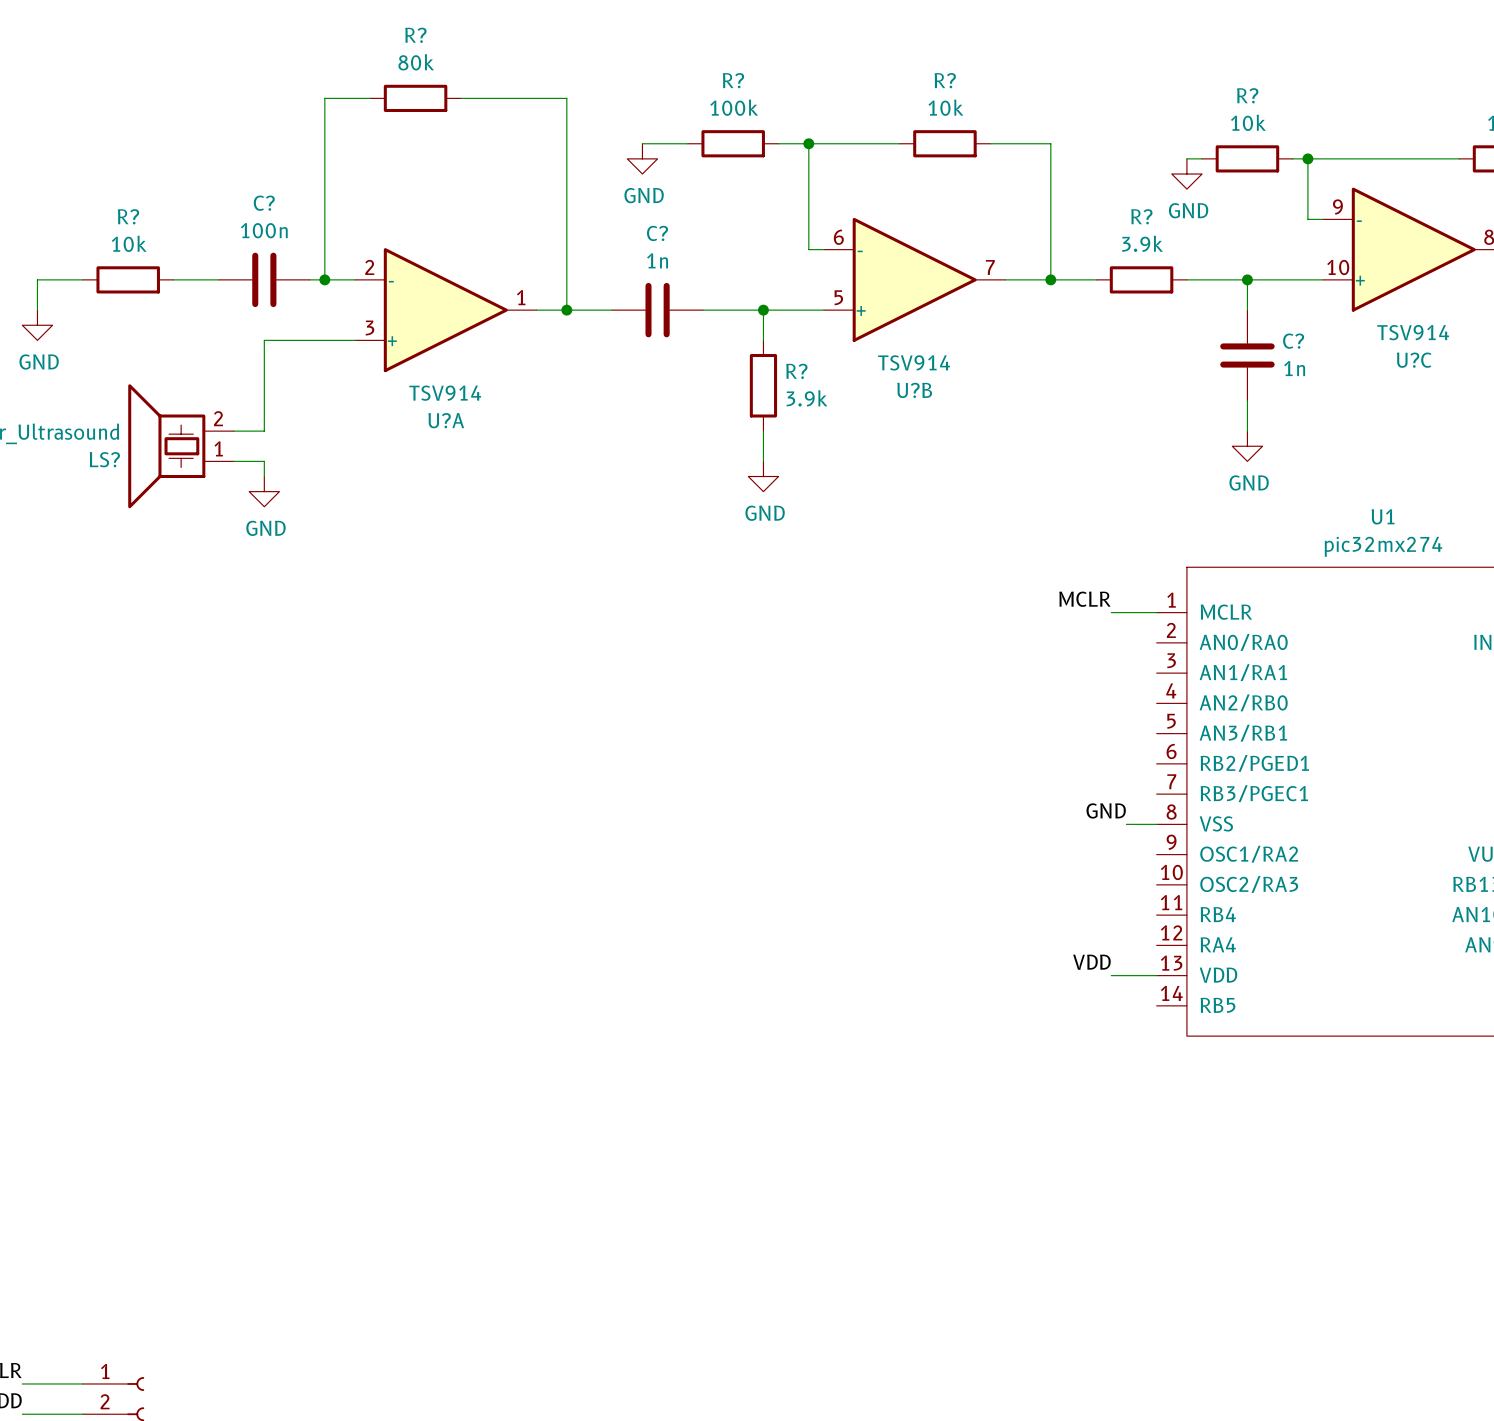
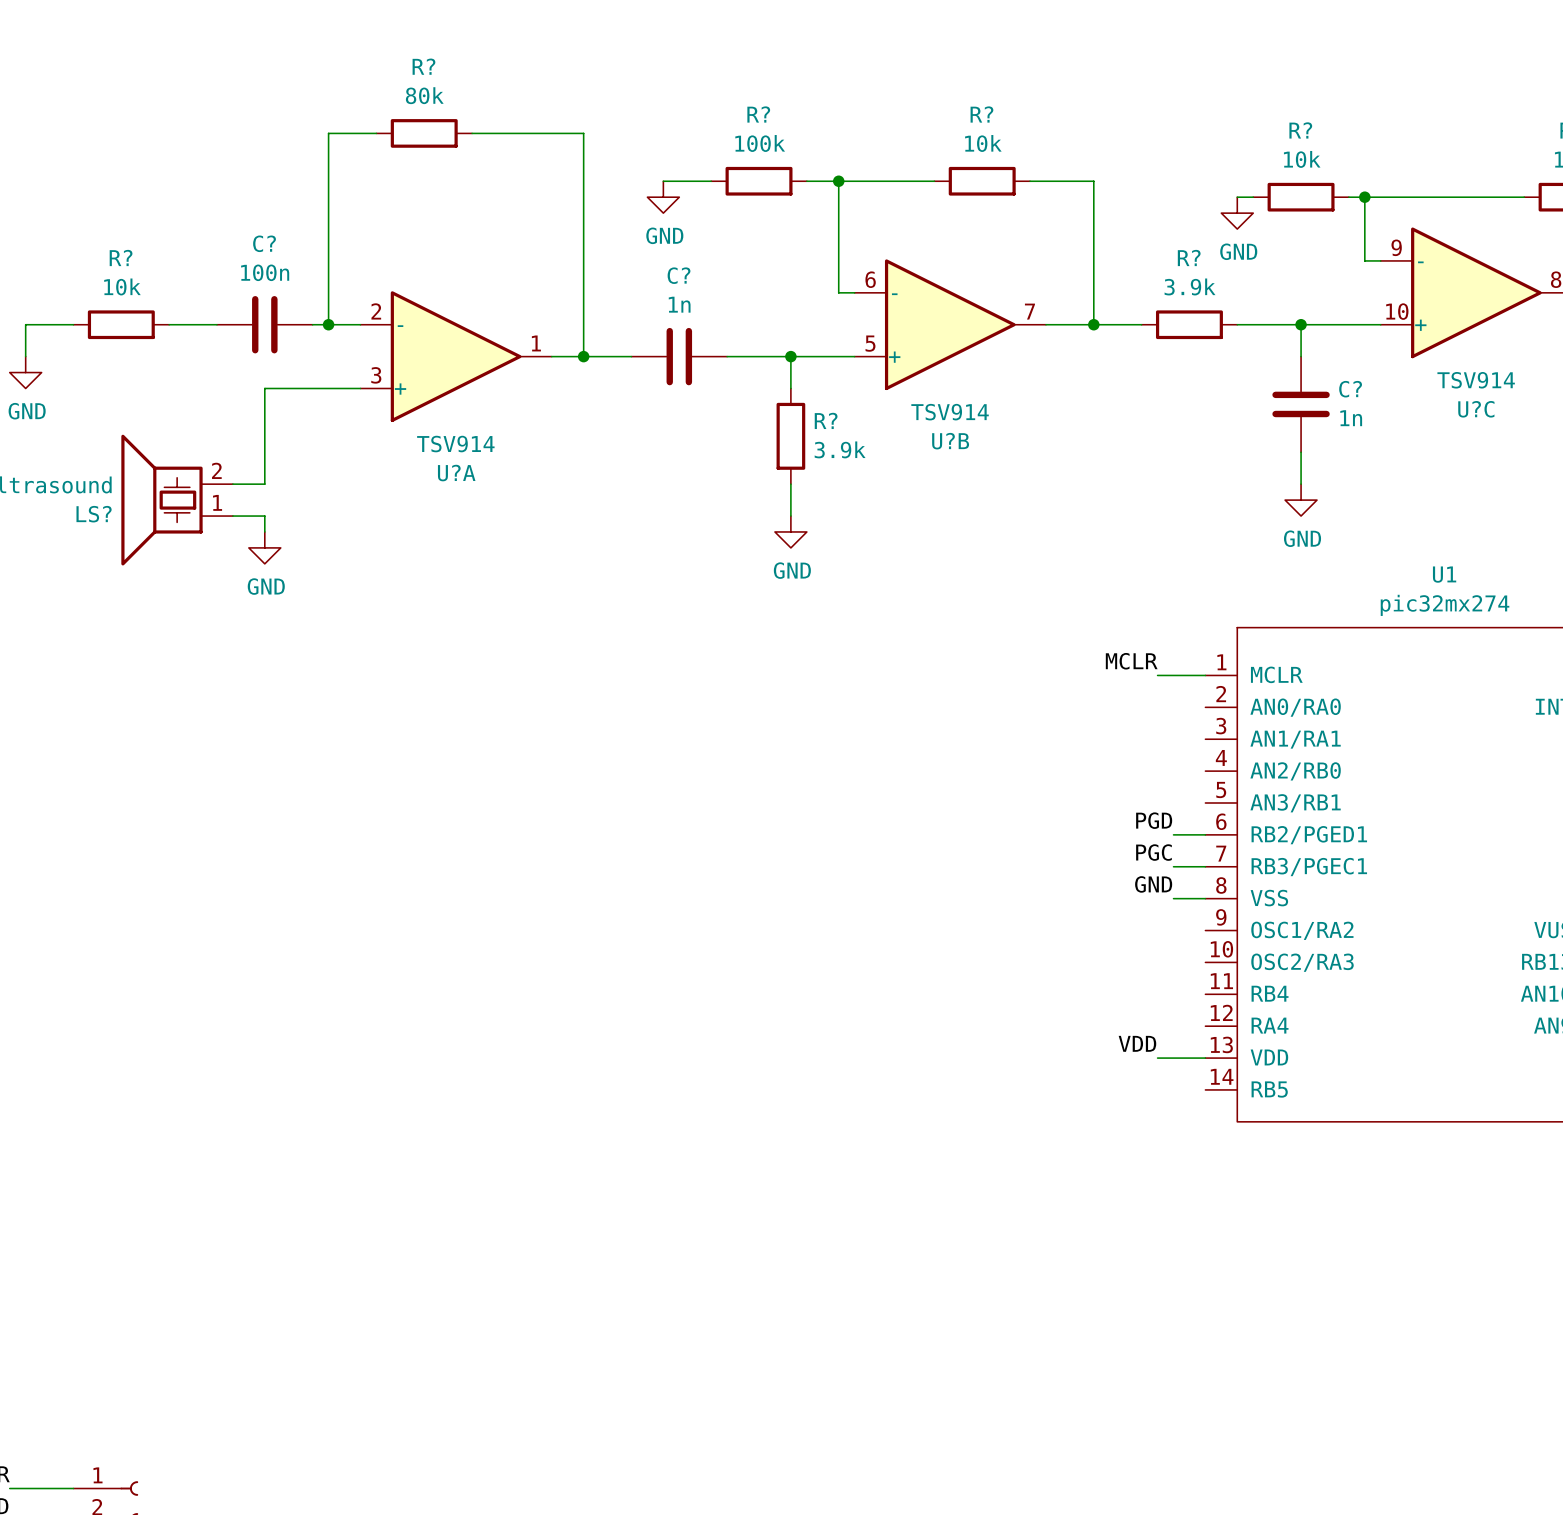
label: none -> PGD (1154, 820)
wire: none -> (1173, 834) (1205, 834)
label: none -> PGC (1153, 852)
wire: none -> (1173, 866) (1205, 866)

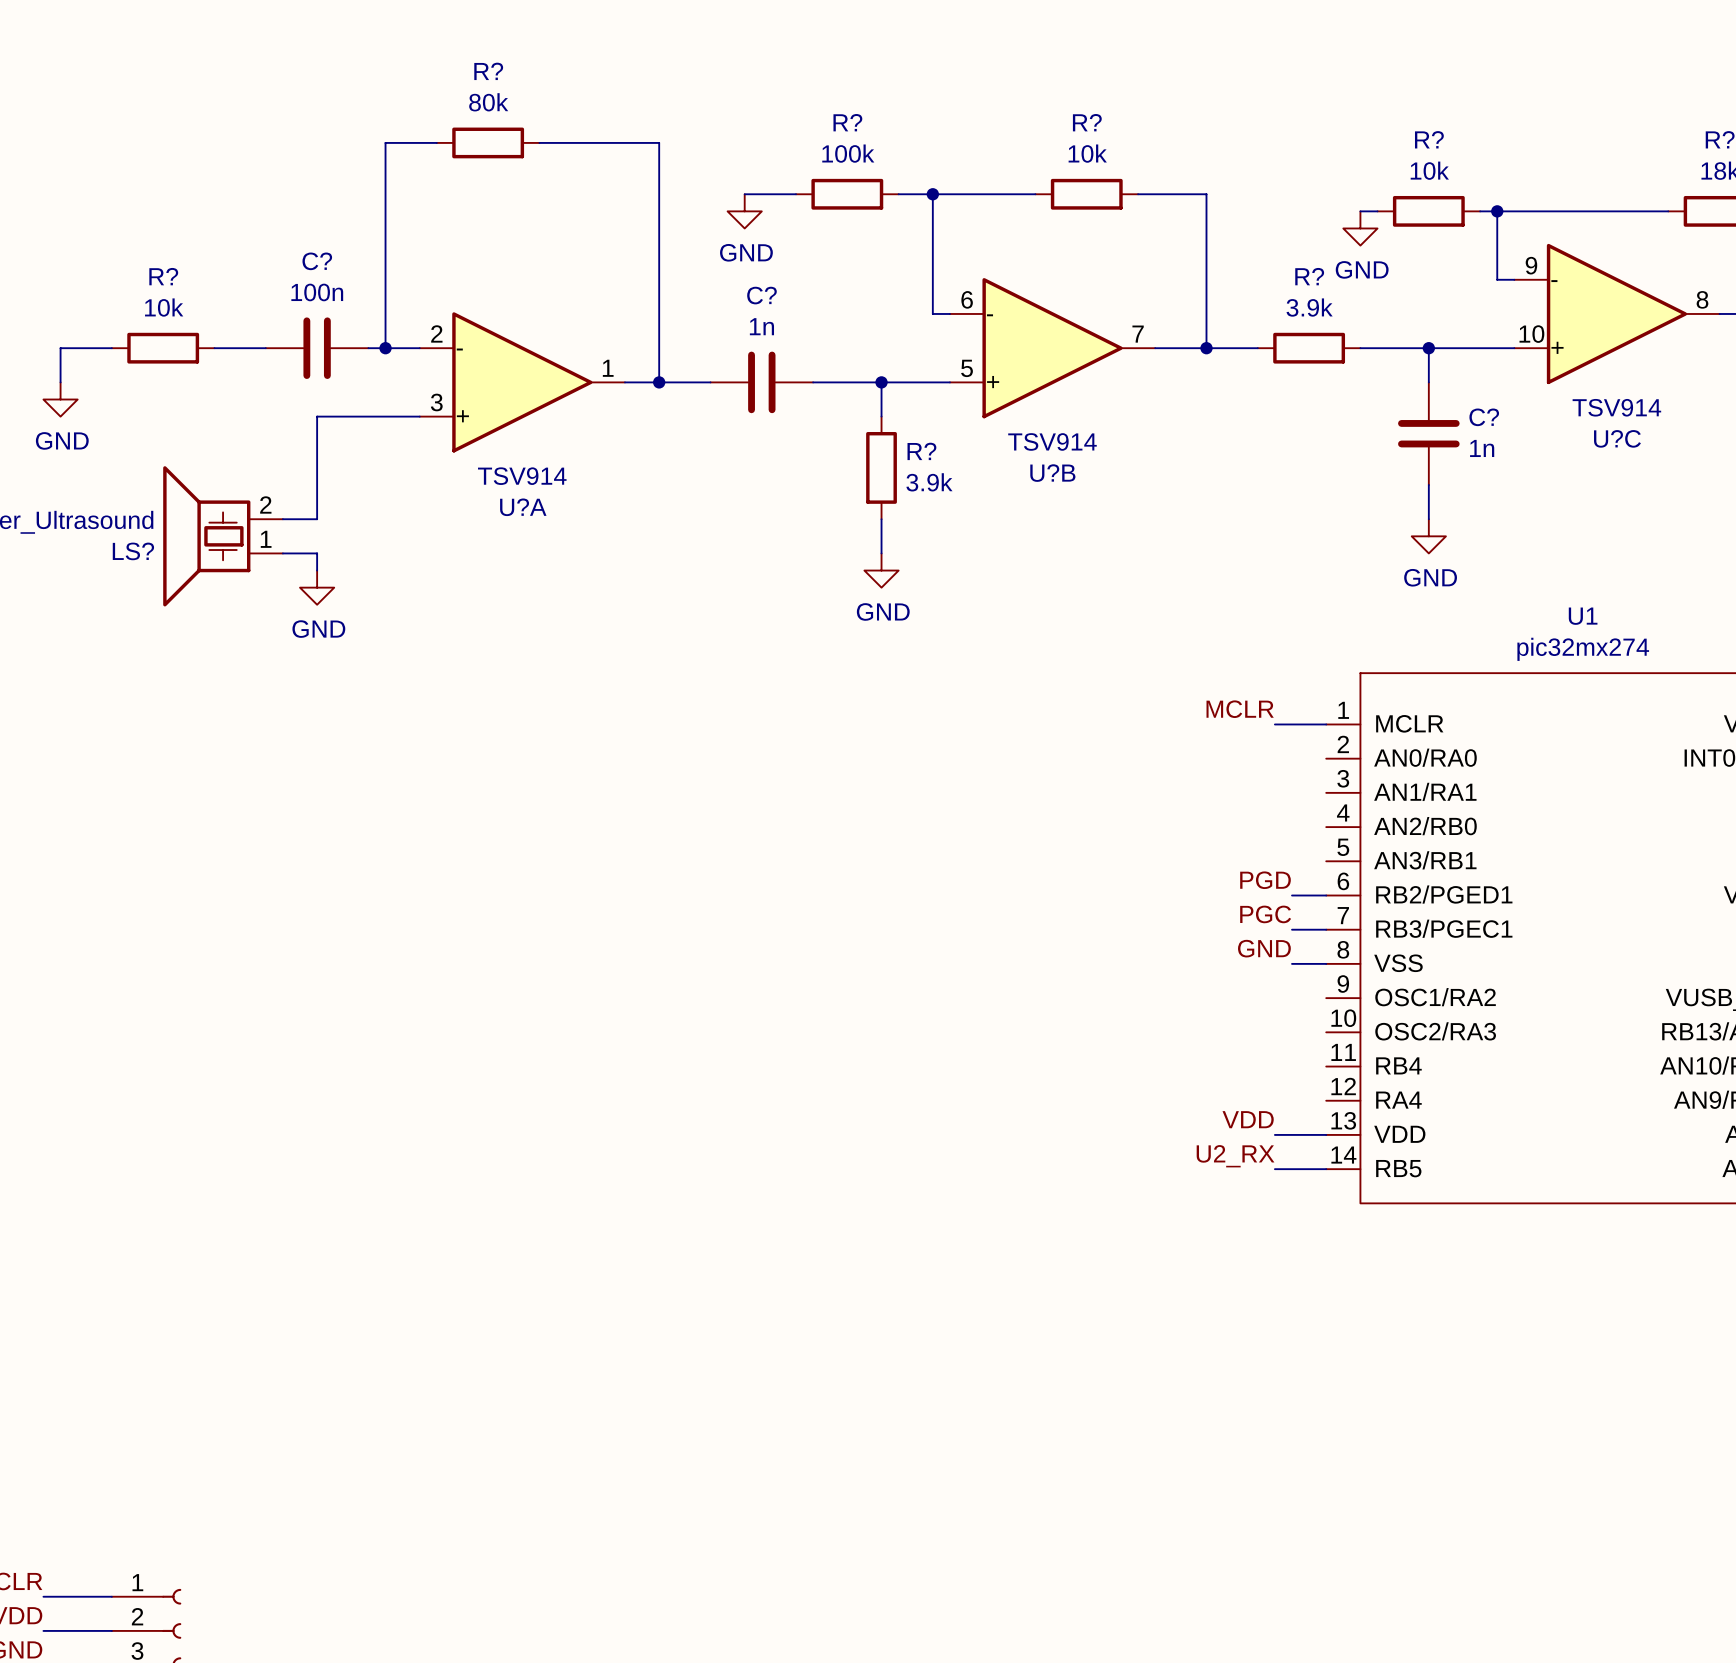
label: none -> U2_RX (1235, 1156)
wire: none -> (1274, 1169) (1326, 1169)

